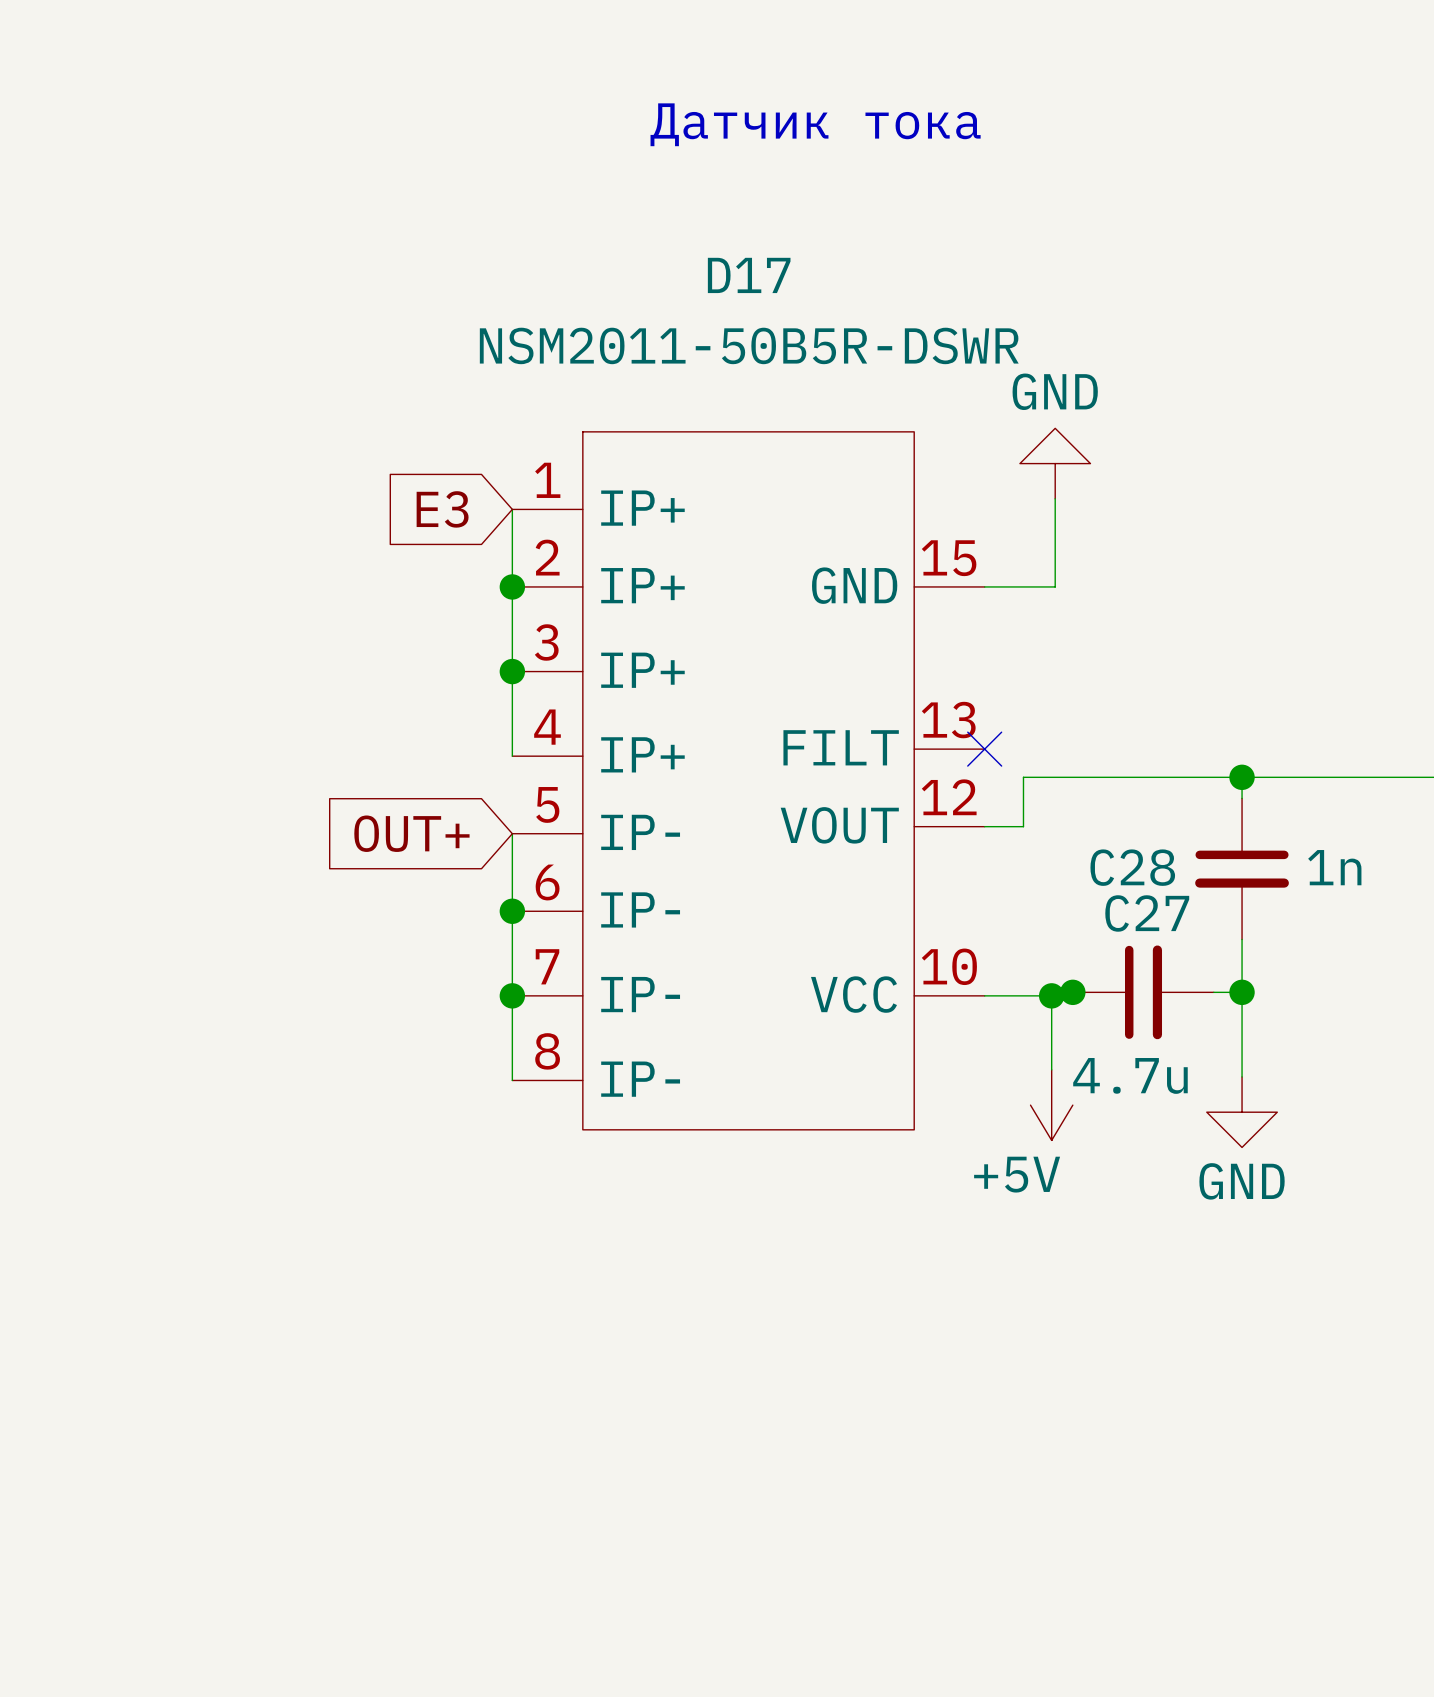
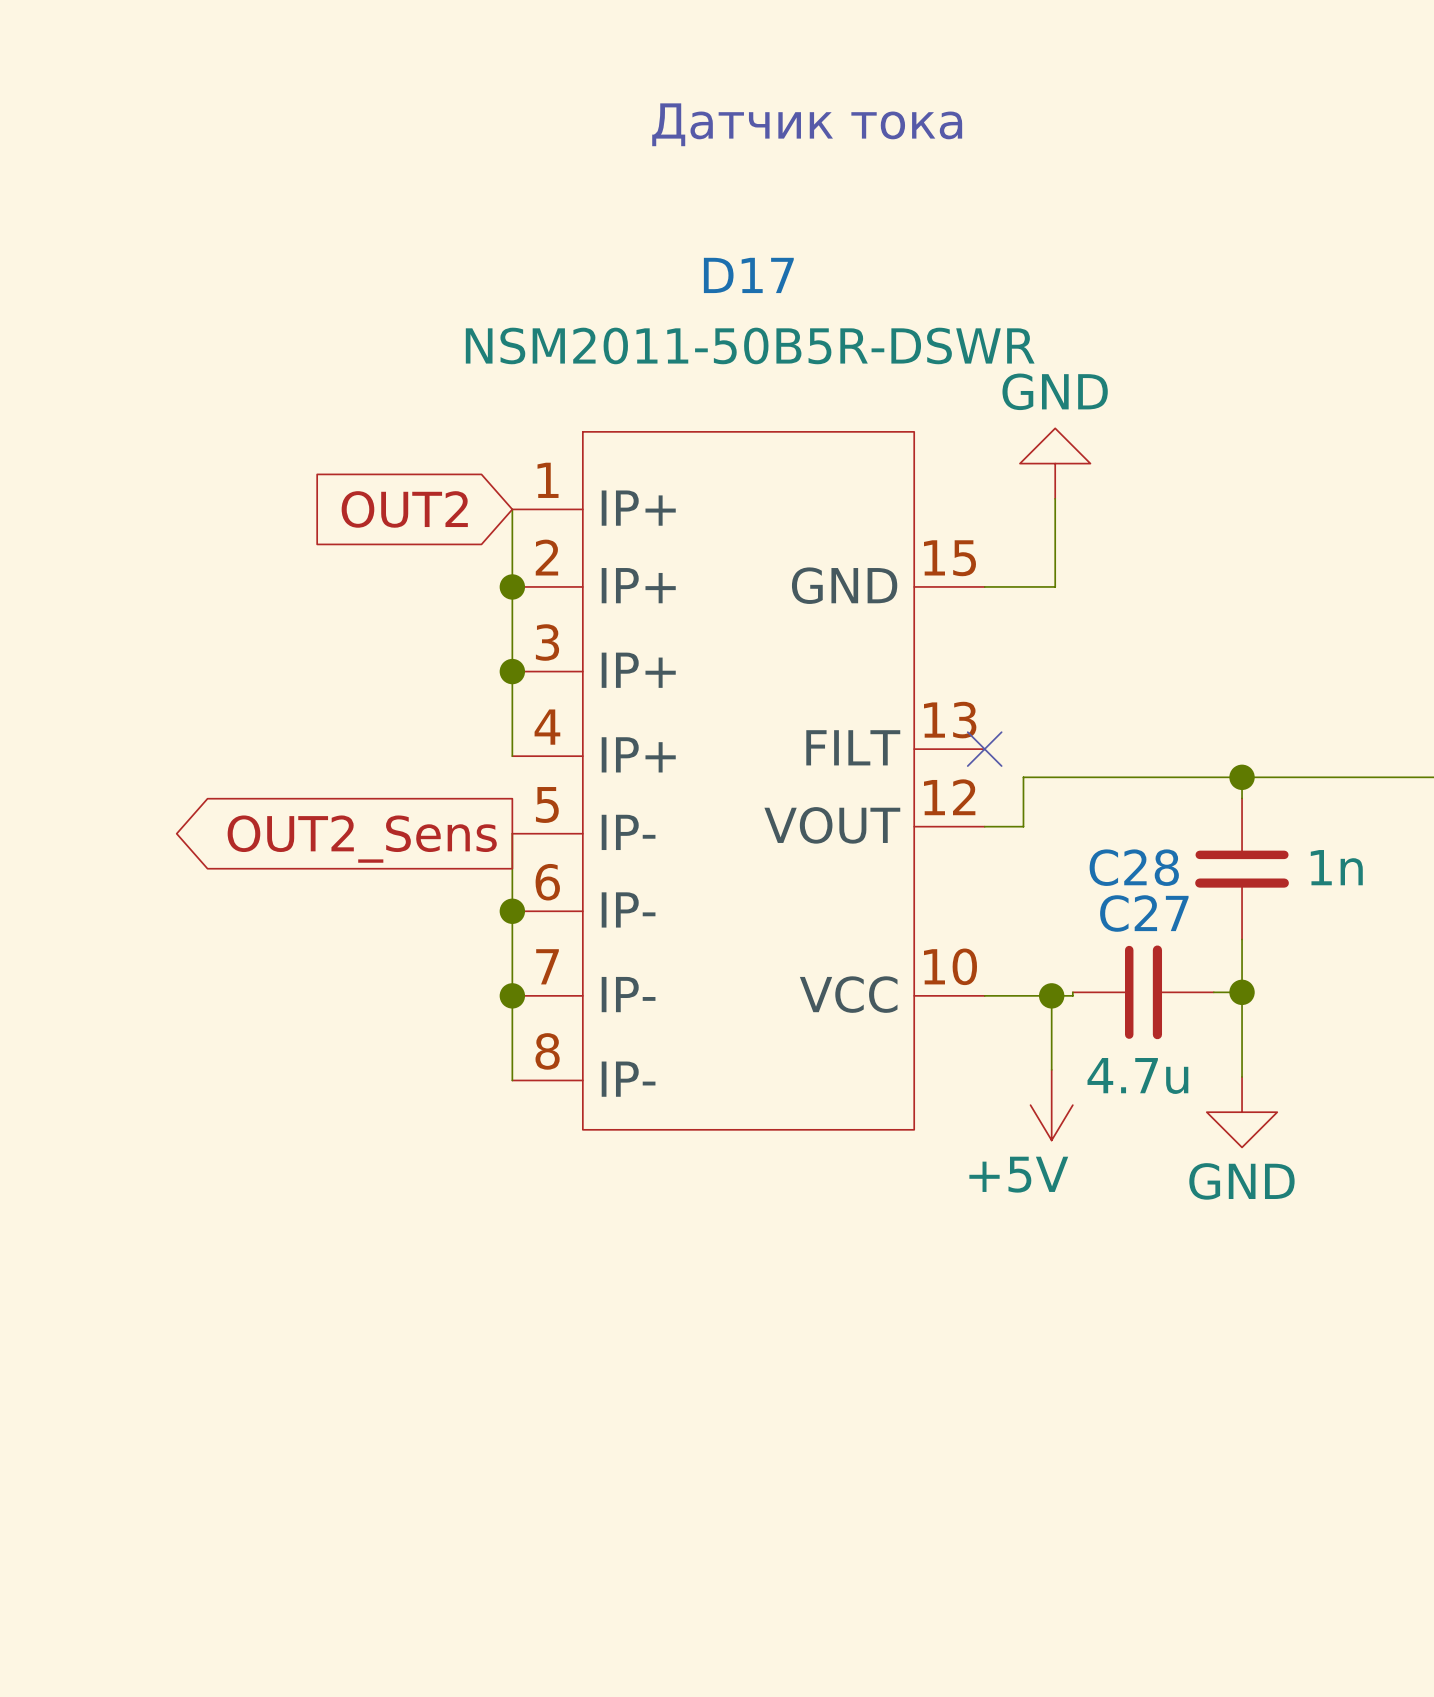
global label: E3 (442, 509) -> OUT2 (404, 509)
global label shape: input (411, 833) -> output (362, 839)
global label: OUT+ (411, 833) -> OUT2_Sens (362, 839)
junction: (1072, 992) -> none

